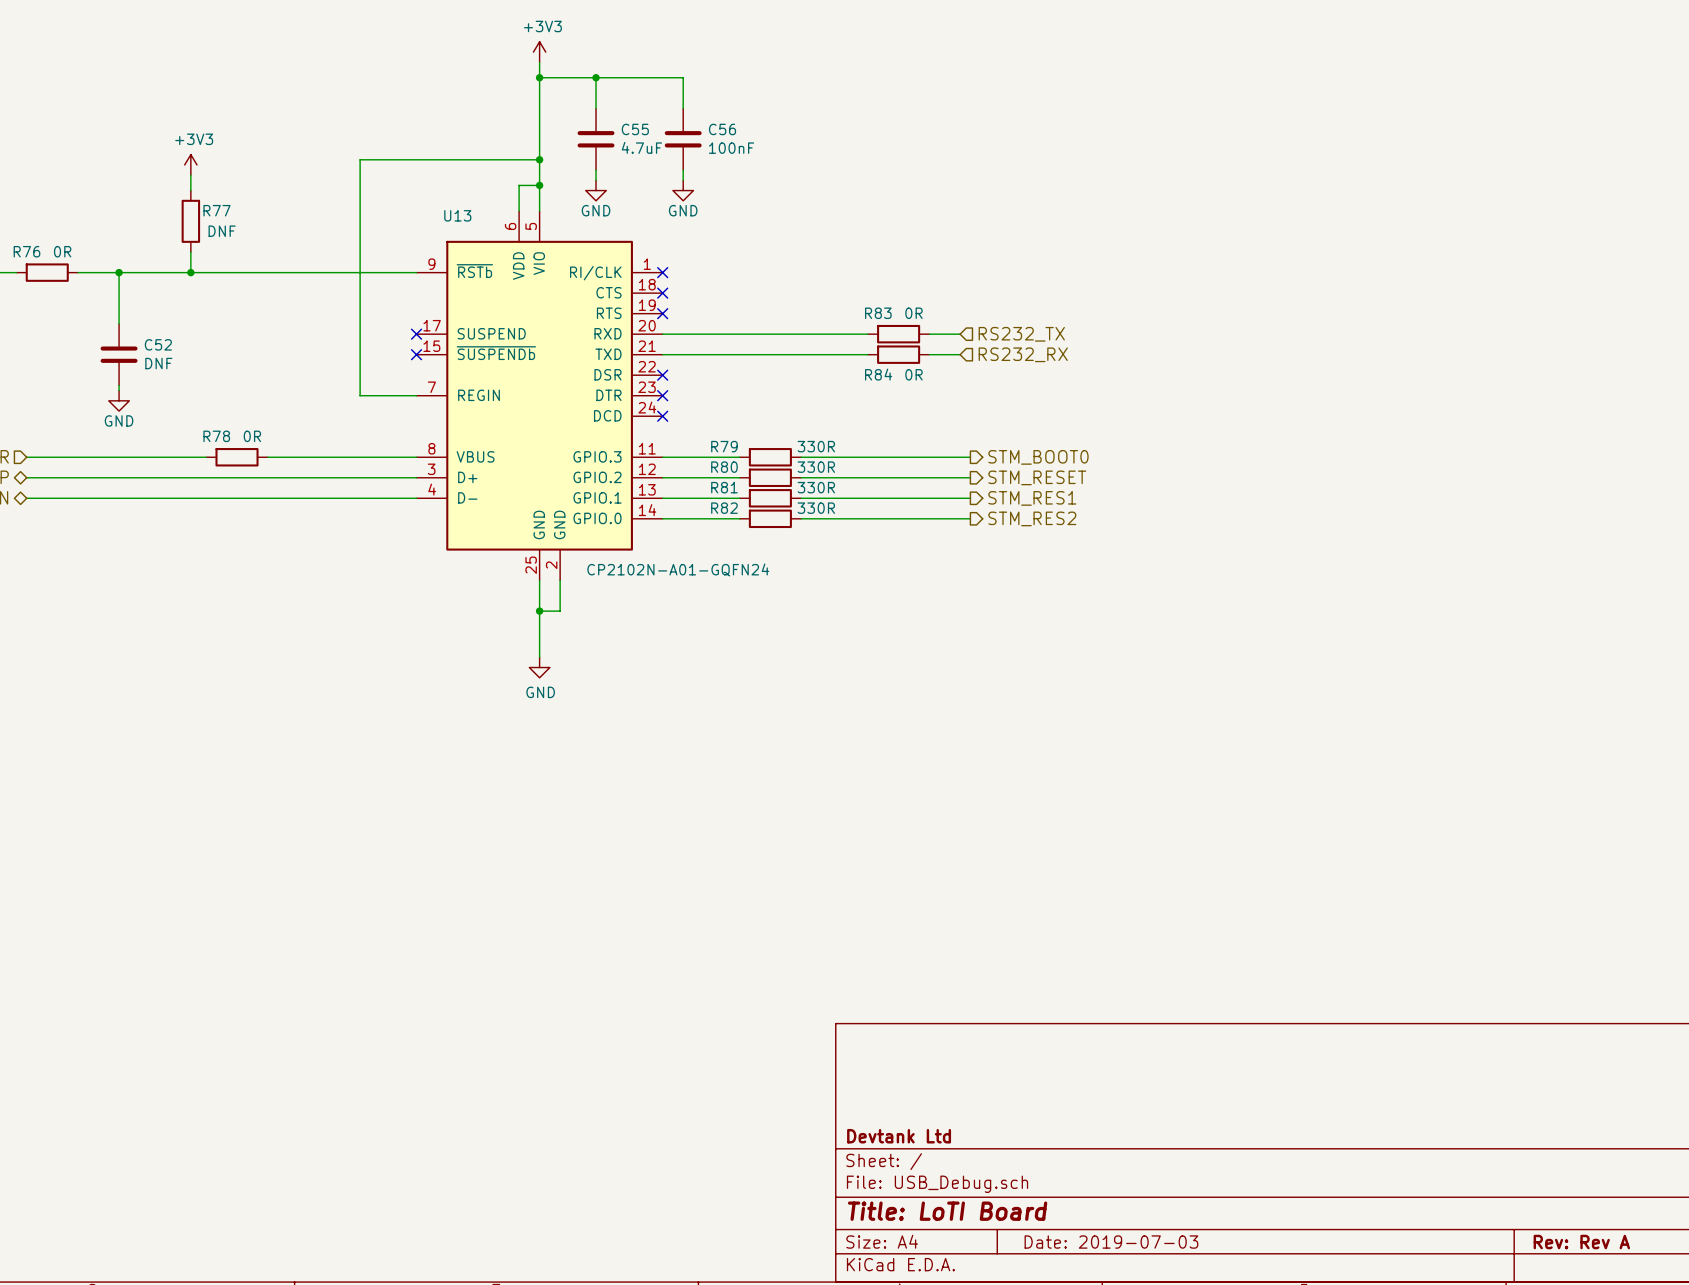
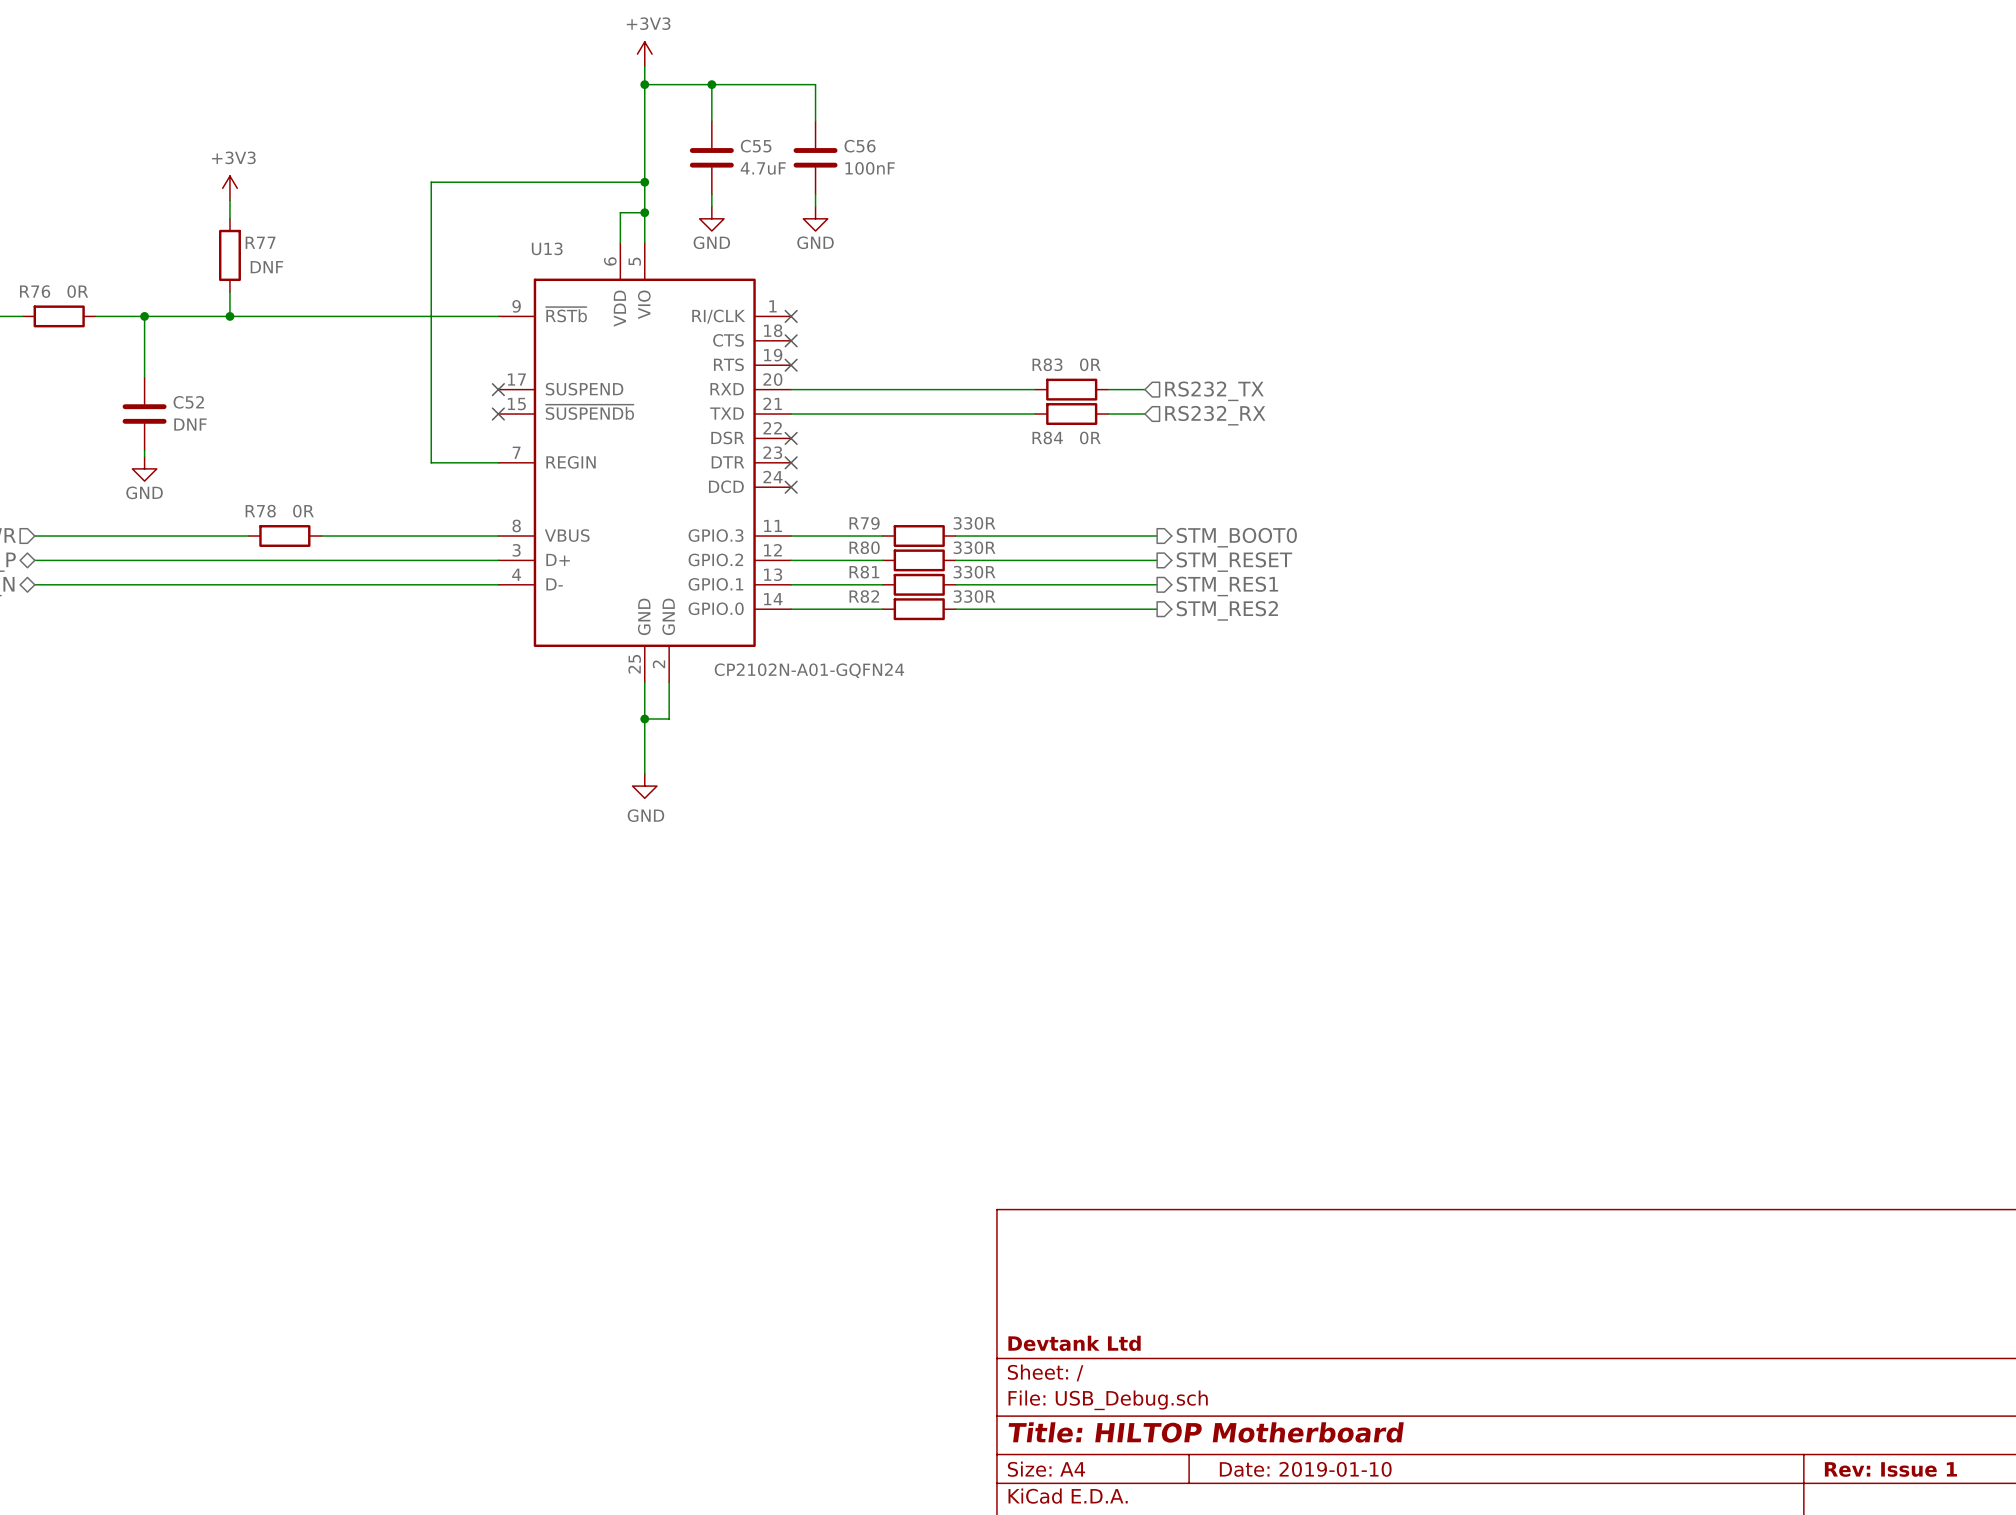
title block: Title: LoTI Board (947, 1211) -> Title: HILTOP Motherboard (1206, 1432)
title block: Date: 2019-07-03 (1111, 1242) -> Date: 2019-01-10 (1305, 1469)
title block: Rev: Rev A (1581, 1242) -> Rev: Issue 1 (1890, 1469)

